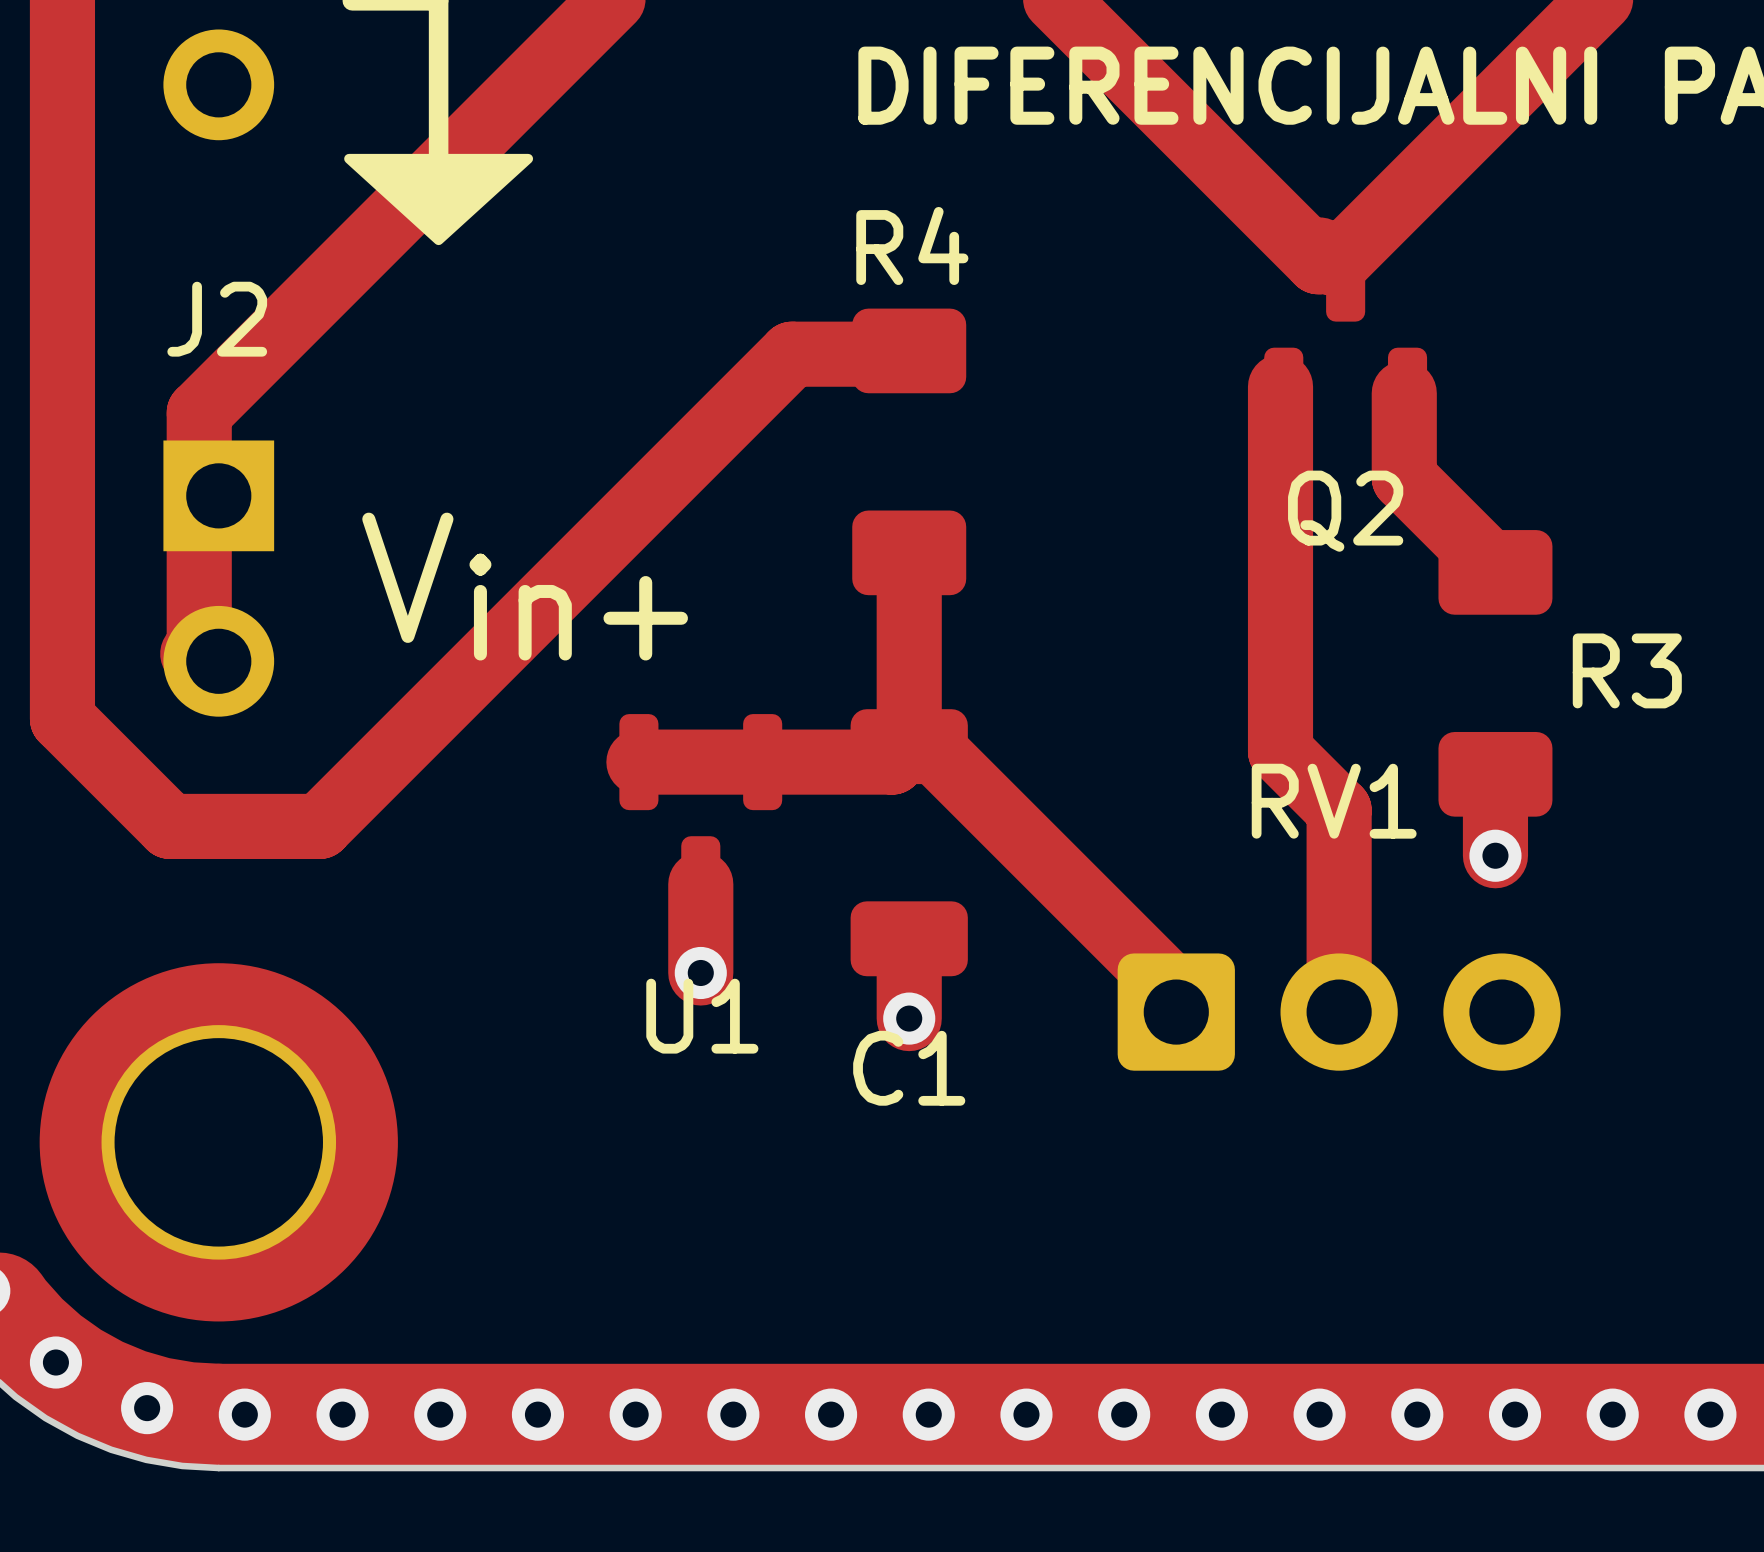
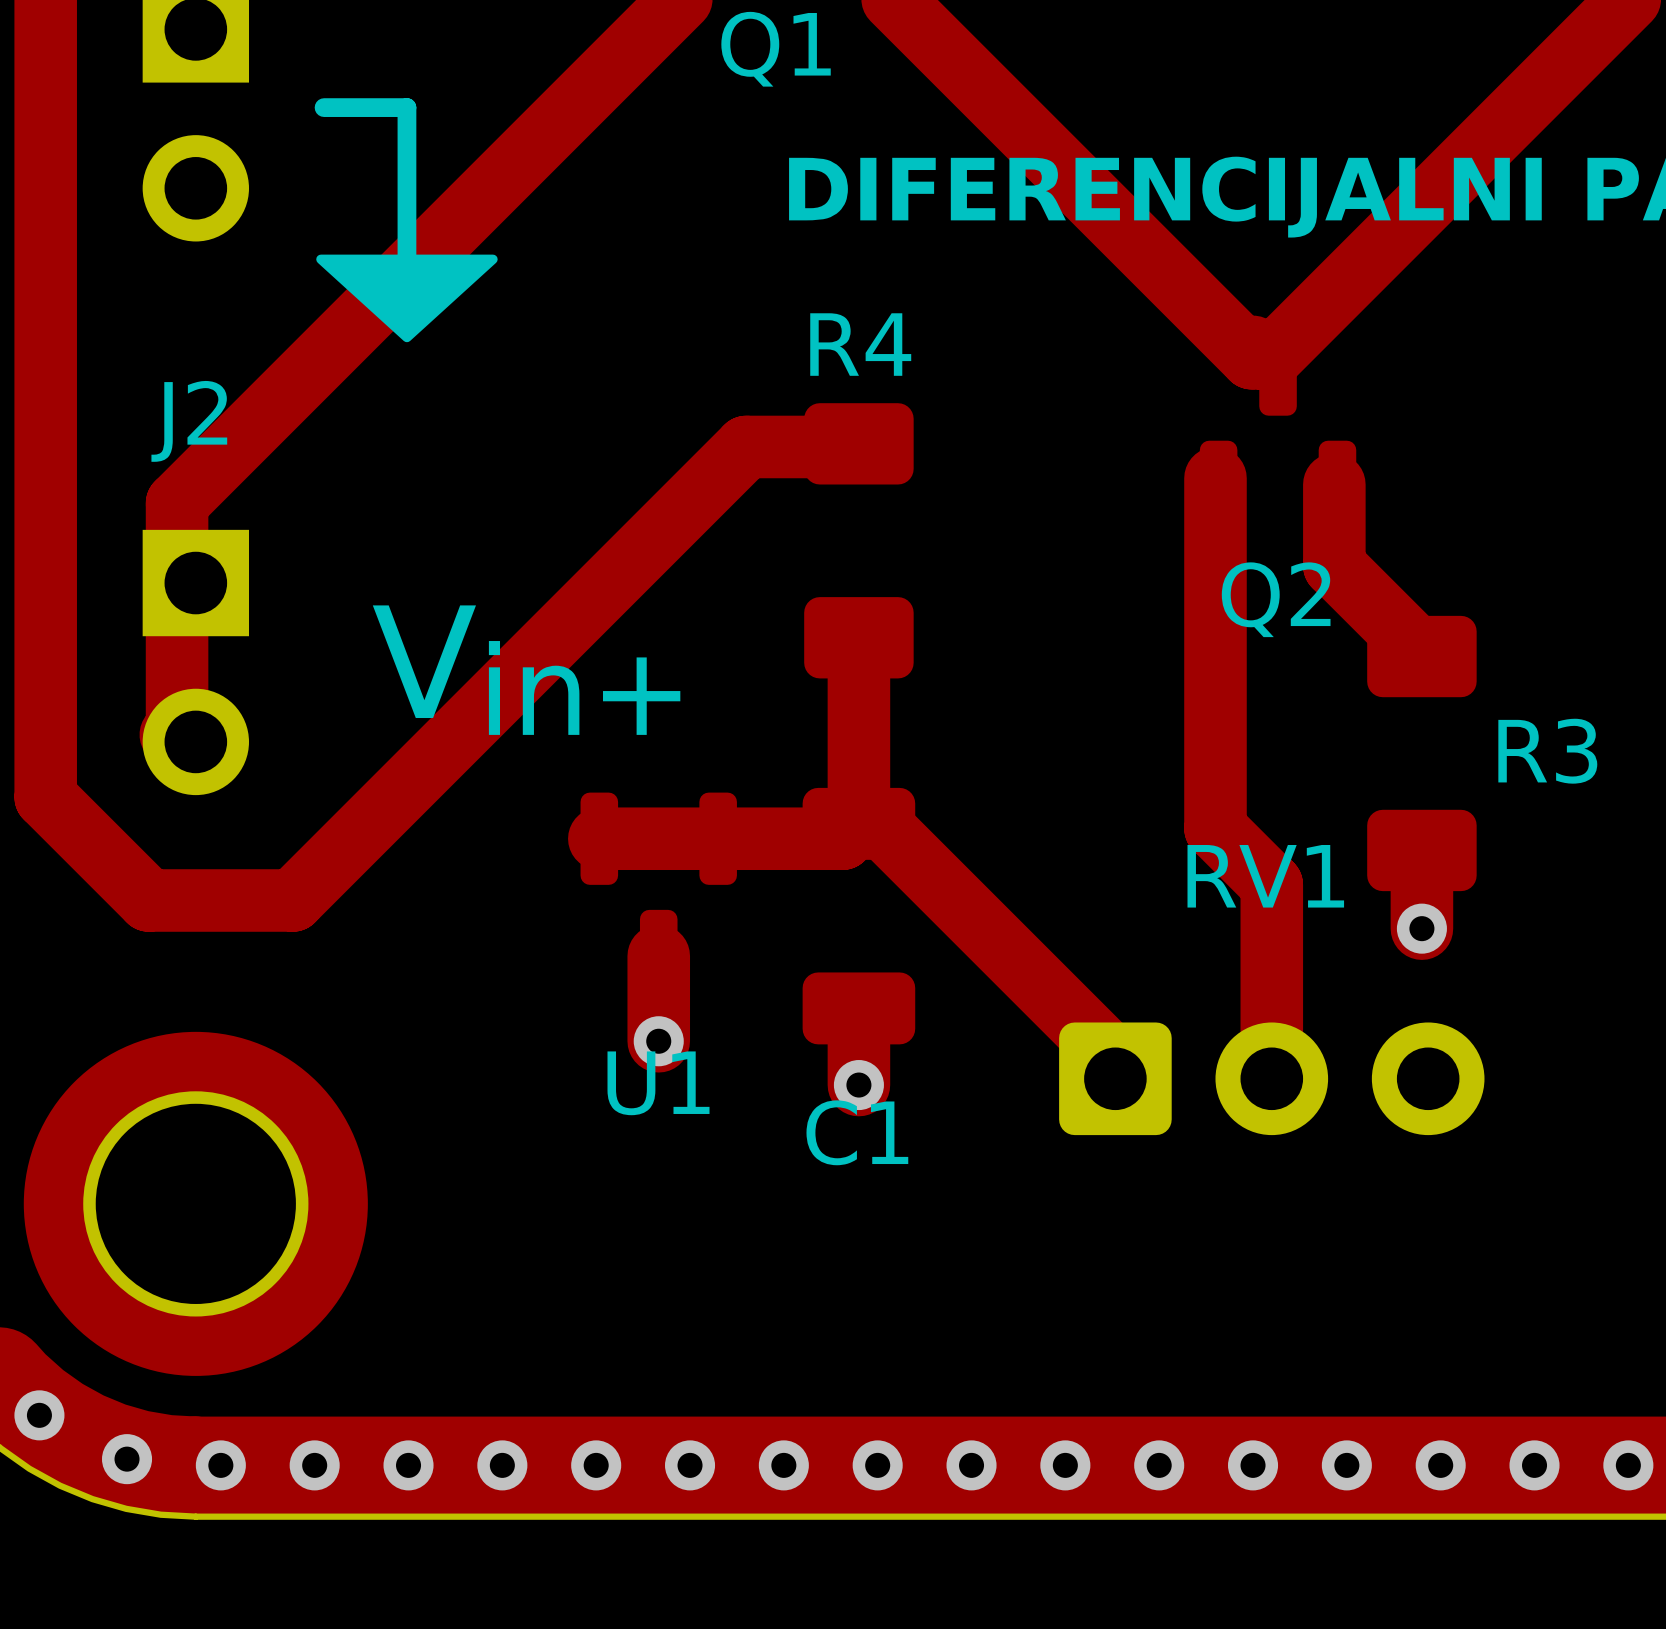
text position: Vin+ (525, 586) -> Vin+ (526, 670)

